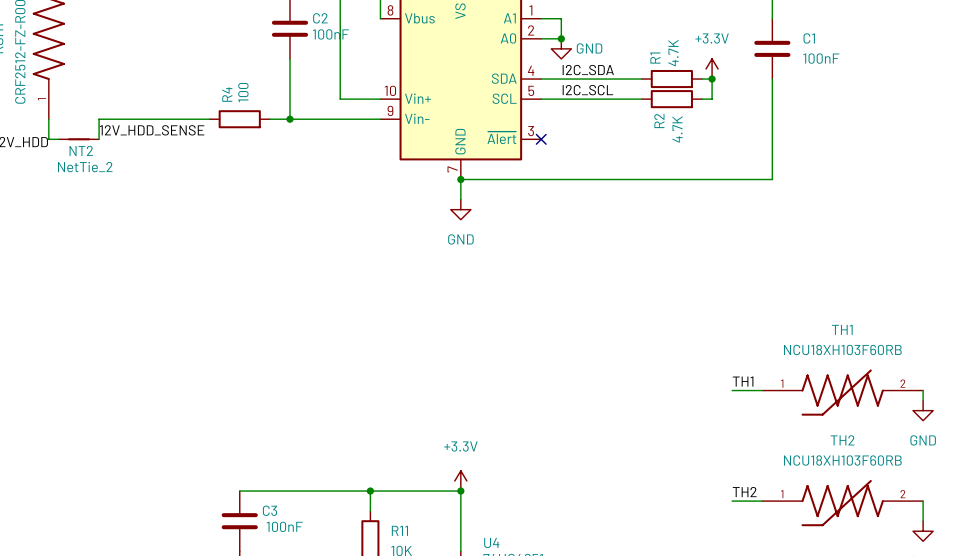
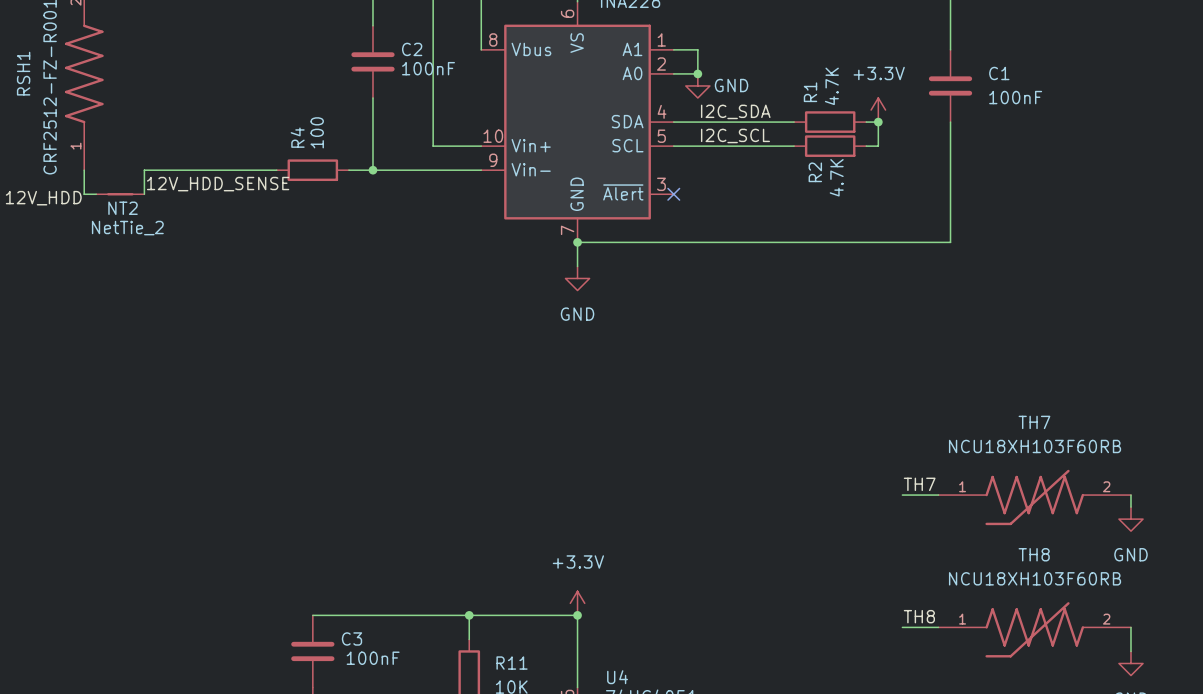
TH1 name: TH1 (842, 329) -> TH7 (1034, 422)
label: TH1 (743, 381) -> TH7 (919, 484)
TH2 name: TH2 (842, 440) -> TH8 (1034, 554)
label: TH2 (744, 492) -> TH8 (919, 616)

